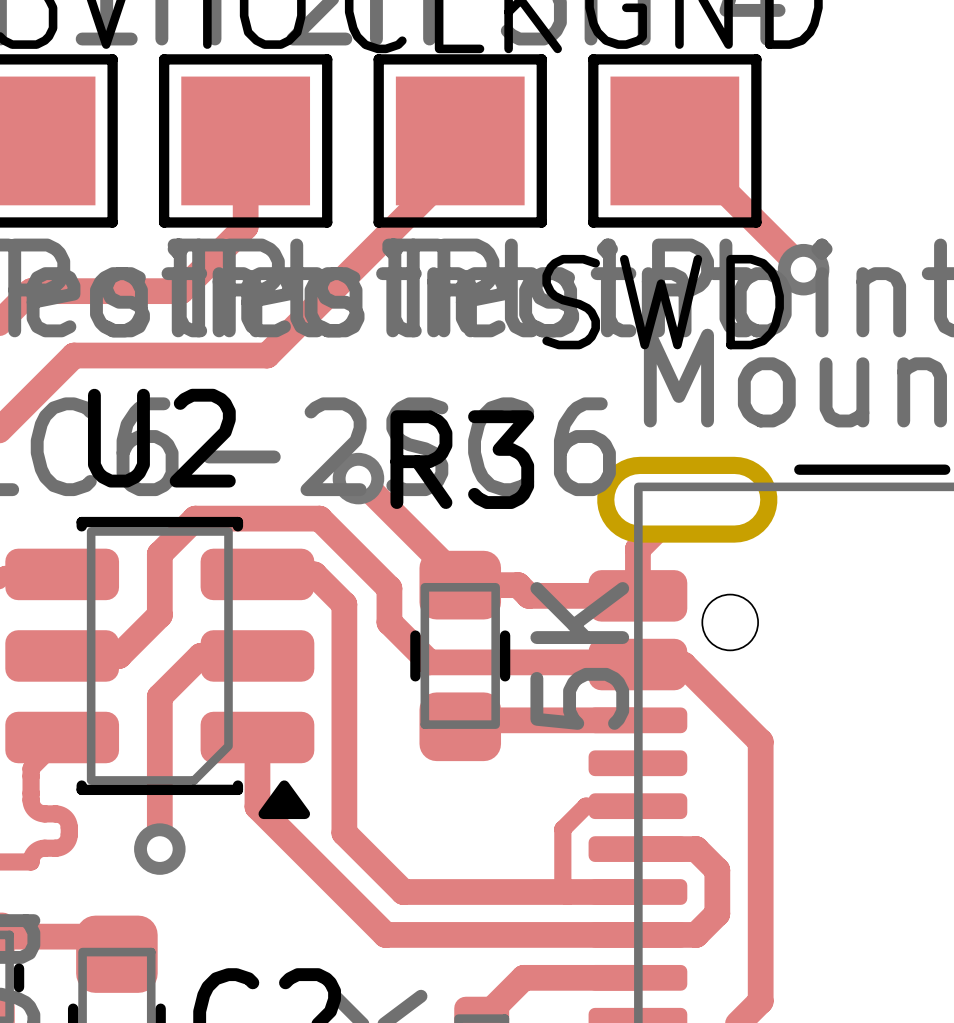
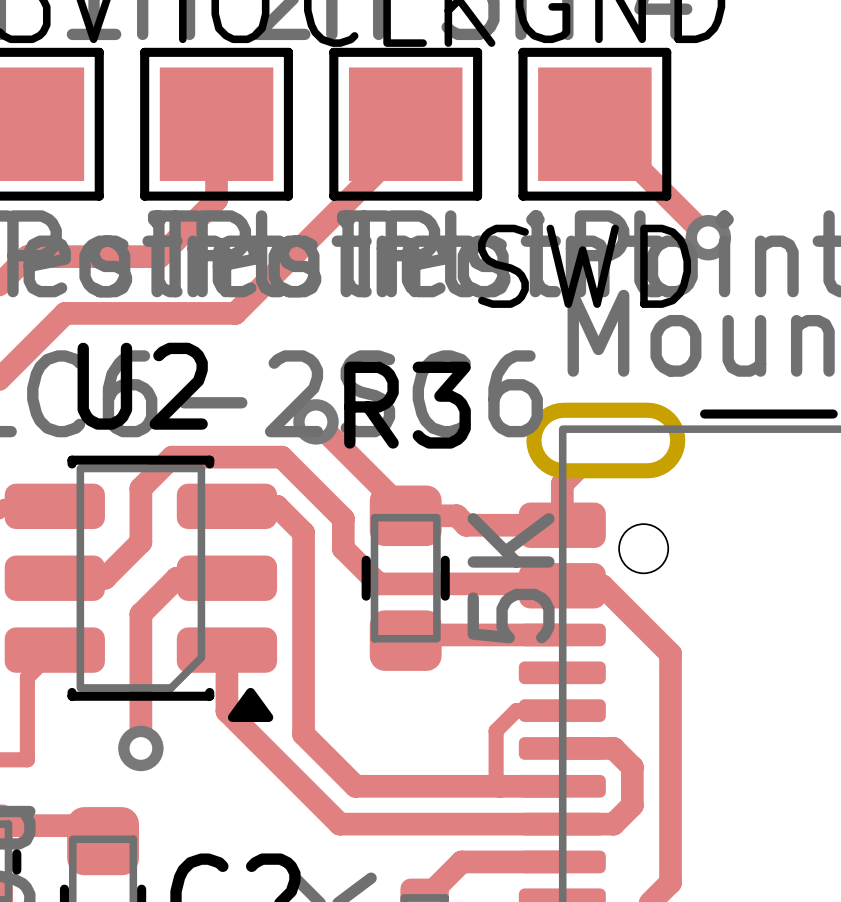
track: (31, 800) (36, 811) (43, 813) (62, 815) (67, 820) (69, 827) (68, 838) (65, 844) (59, 847) (37, 850) (32, 855) (31, 861) -> (27, 705) (27, 759)

